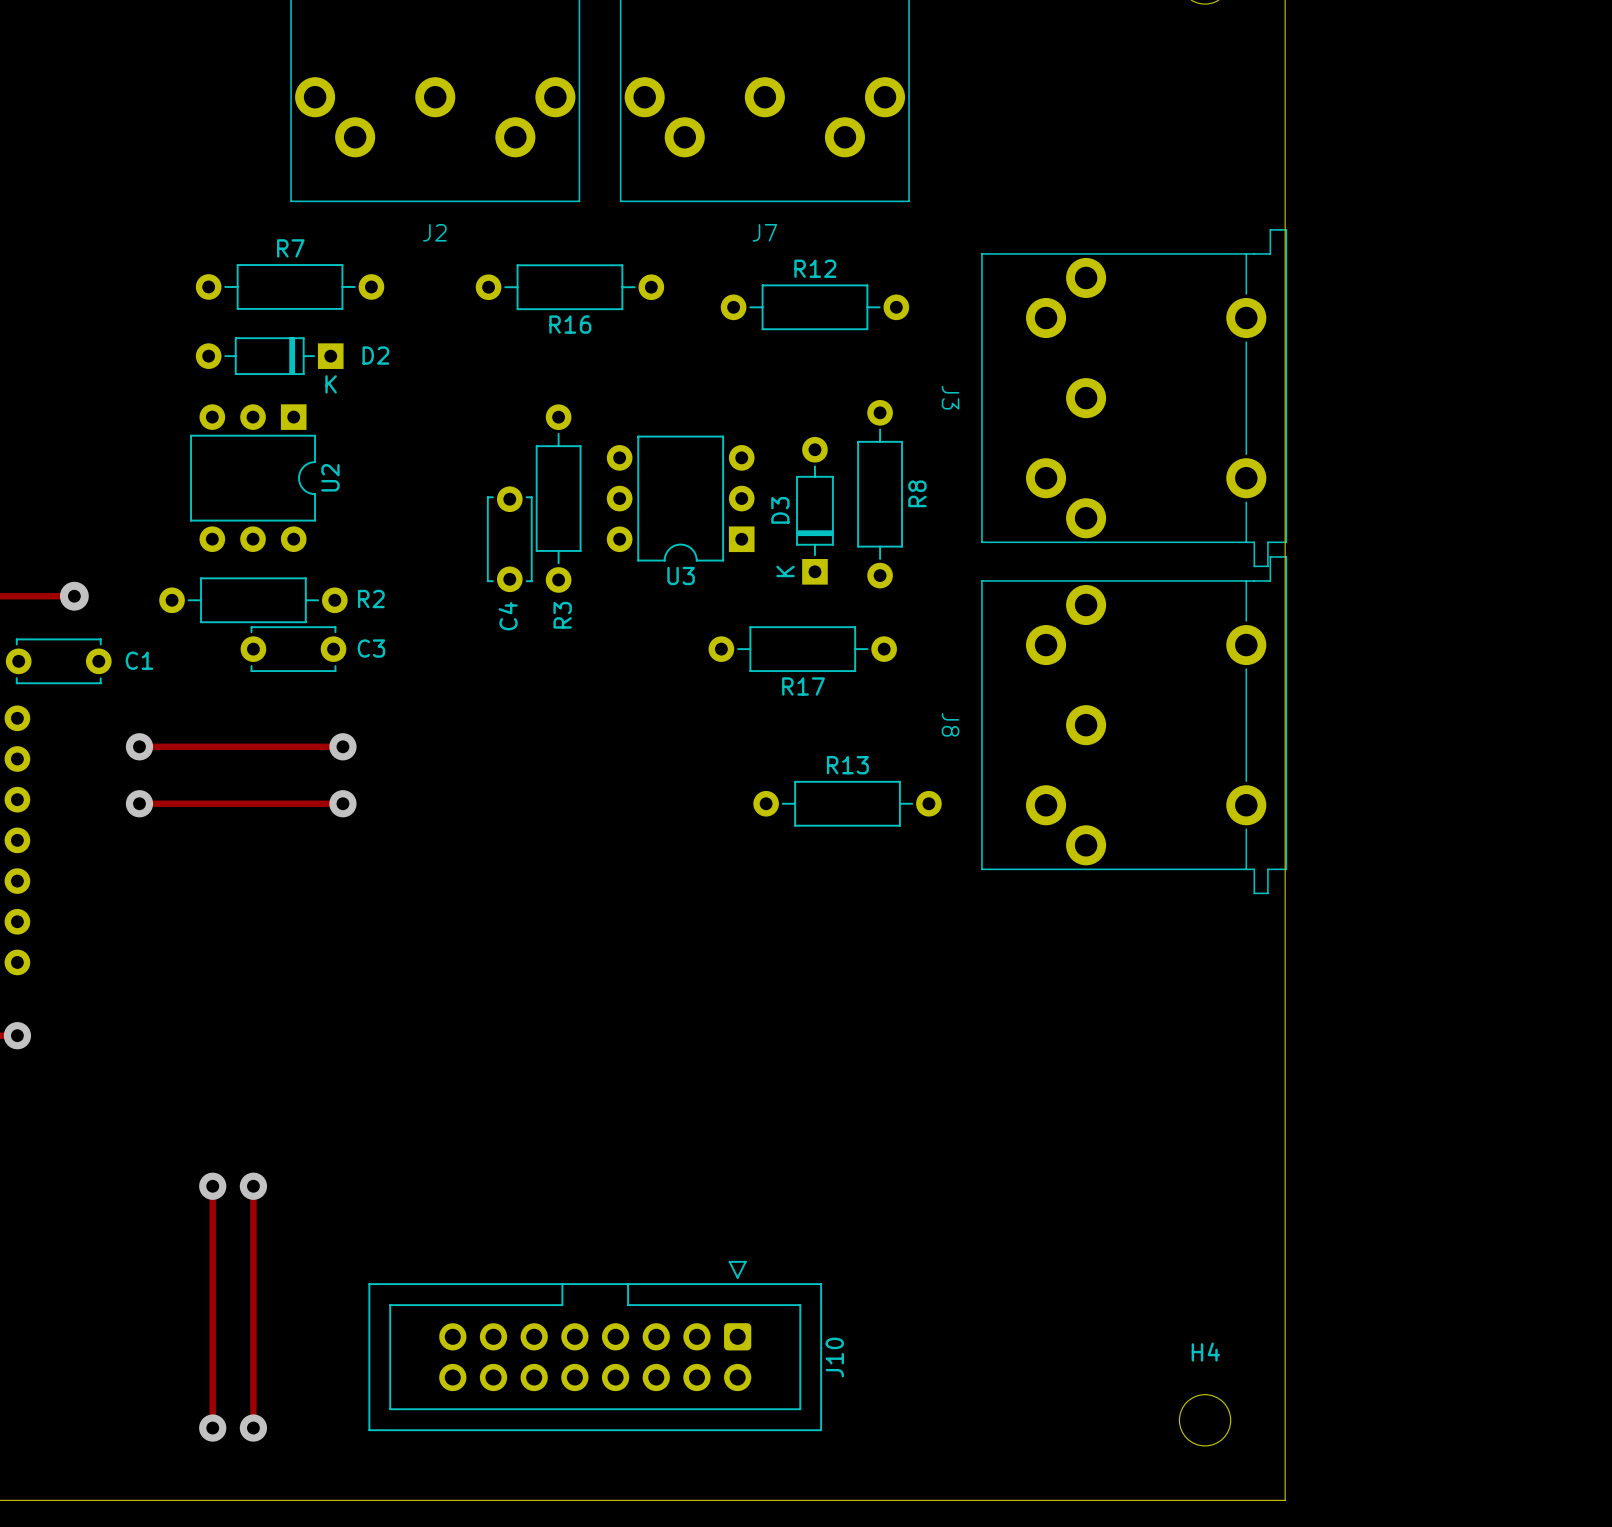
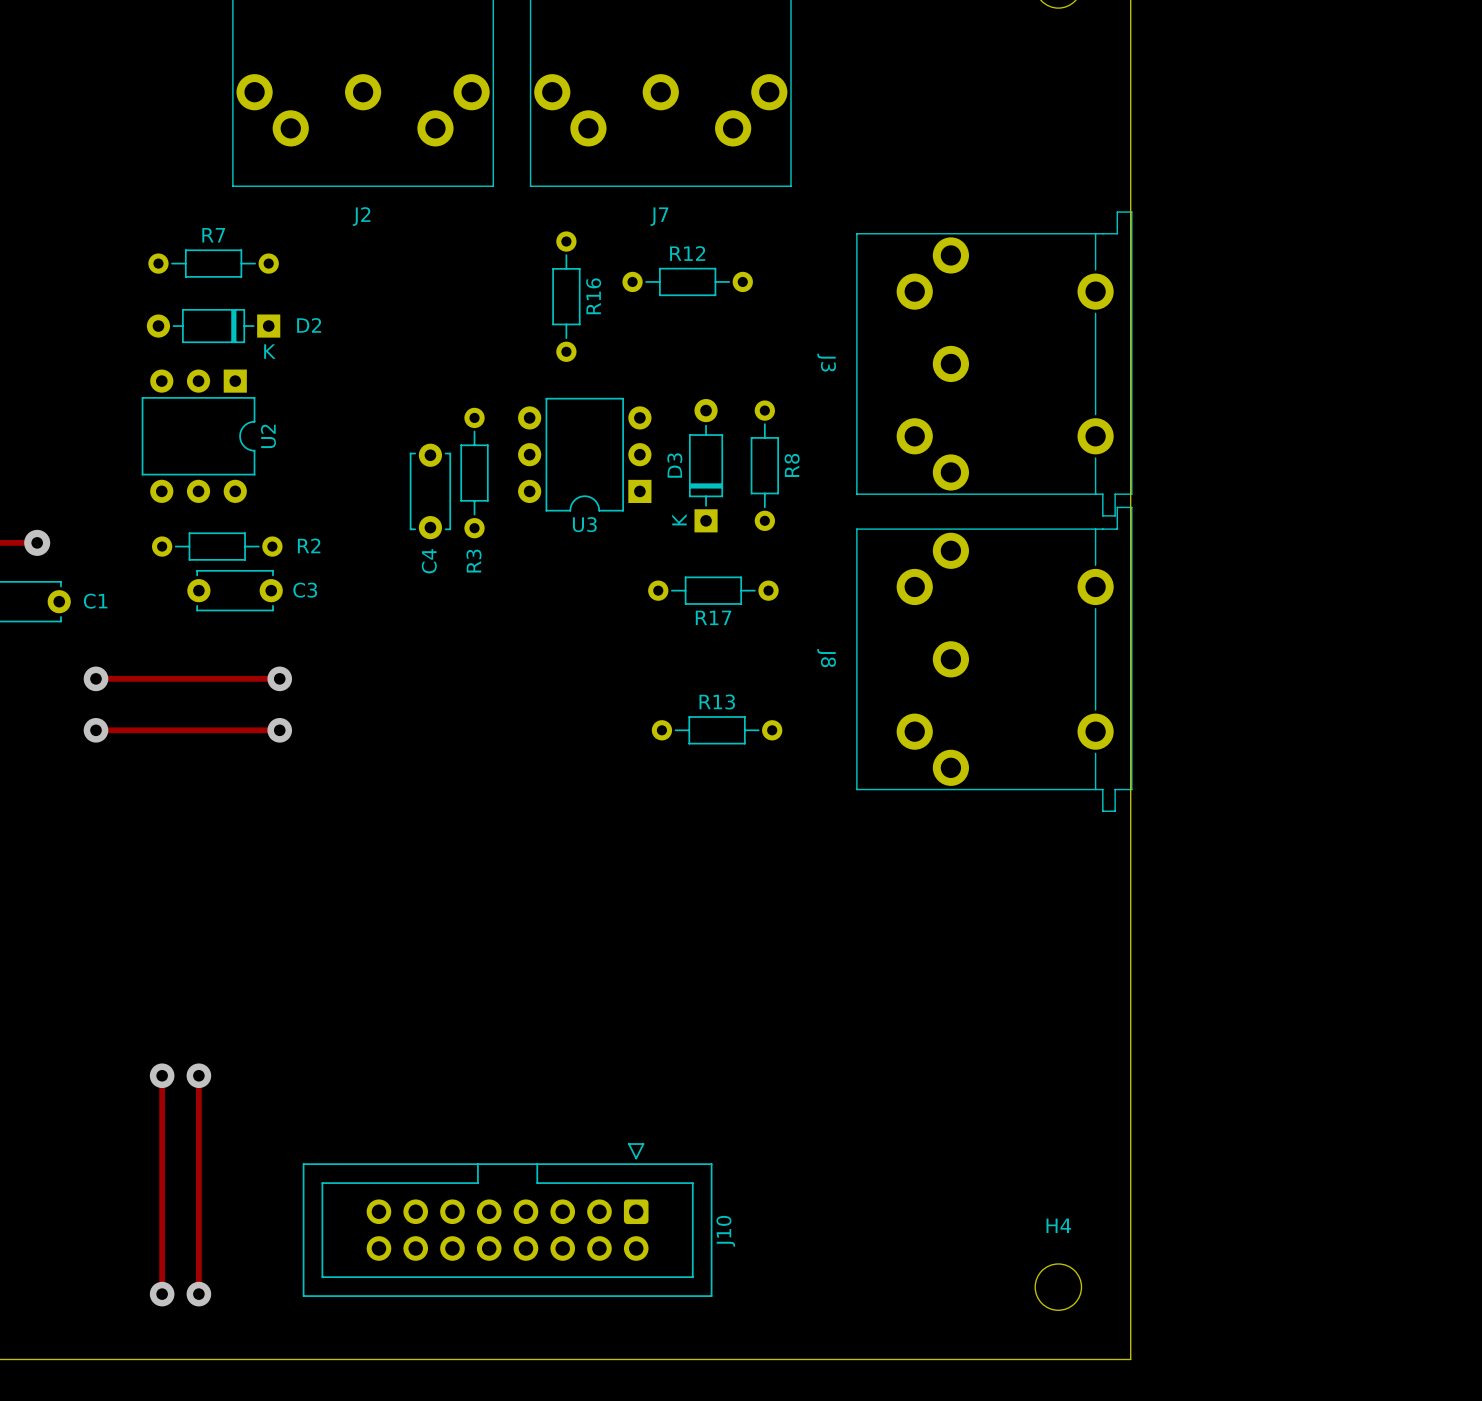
R7 footprint: [195, 264, 385, 310] -> [148, 249, 279, 278]
R16 footprint: [475, 264, 665, 311] -> [552, 231, 581, 362]
R12 footprint: [720, 284, 910, 331] -> [622, 267, 753, 297]
R16 name position: R16 (570, 324) -> R16 (593, 296)
R8 footprint: [857, 400, 903, 589] -> [750, 400, 780, 531]
R3 footprint: [535, 404, 582, 593] -> [460, 407, 489, 539]
R2 footprint: [159, 577, 348, 624] -> [152, 532, 283, 561]
R17 footprint: [708, 626, 897, 673] -> [648, 576, 779, 605]
R13 footprint: [753, 780, 942, 827] -> [651, 716, 783, 745]

